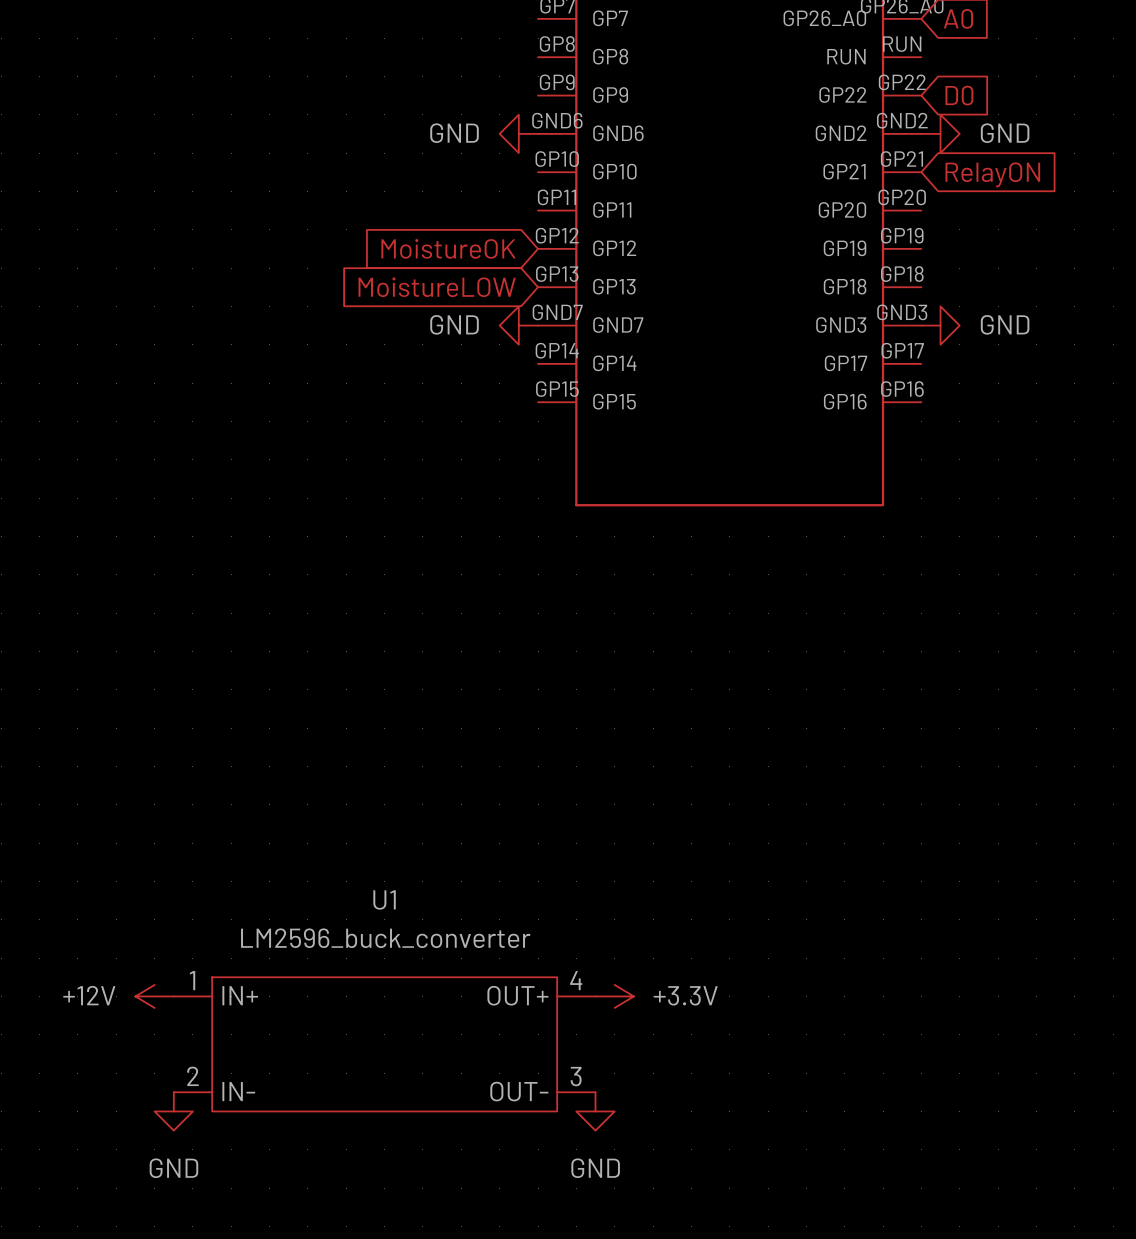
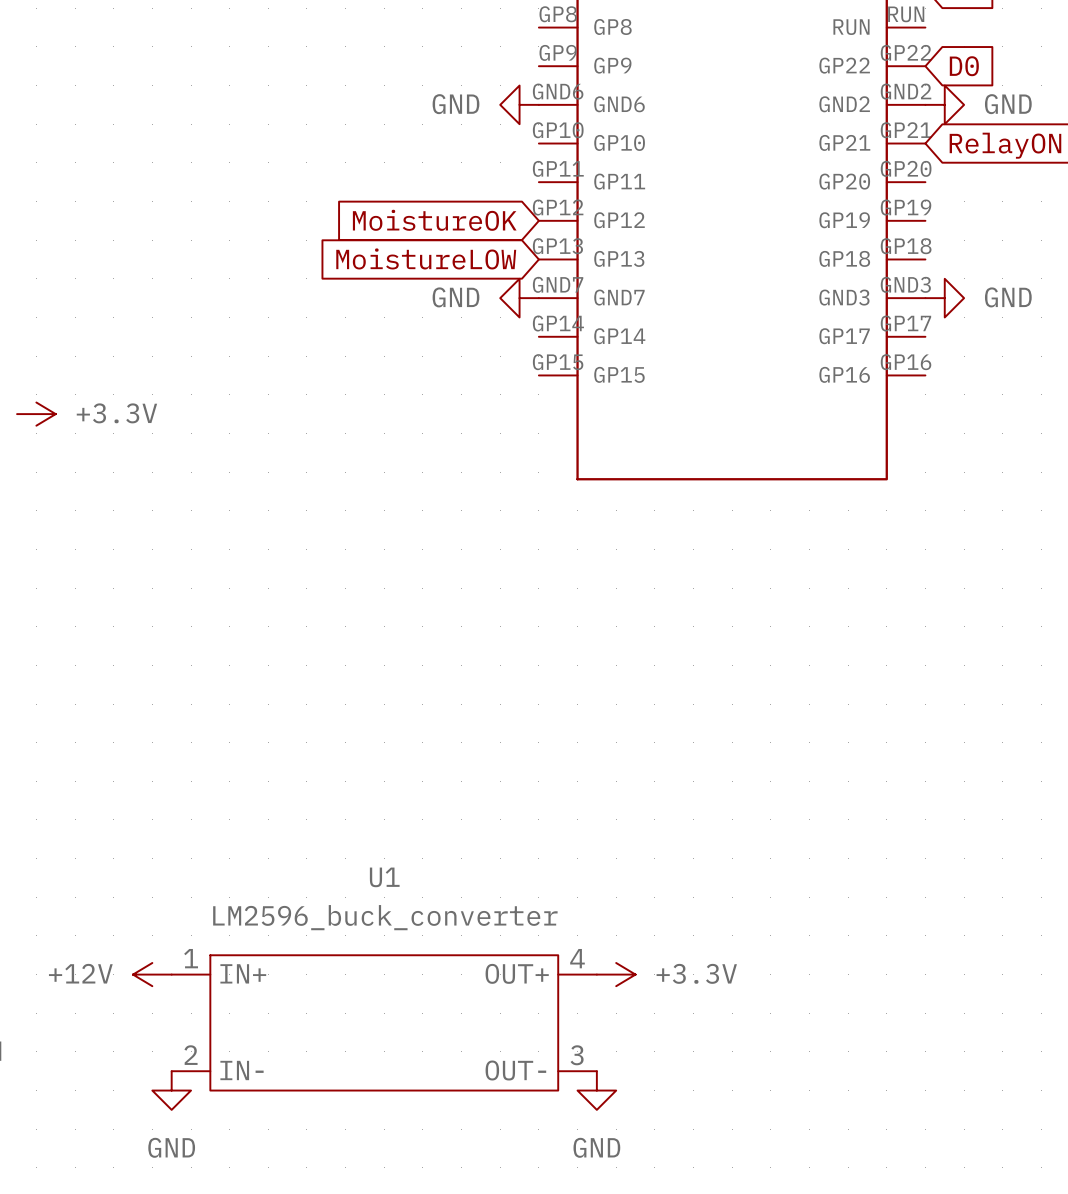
power symbol: none -> +3.3V (36, 414)

